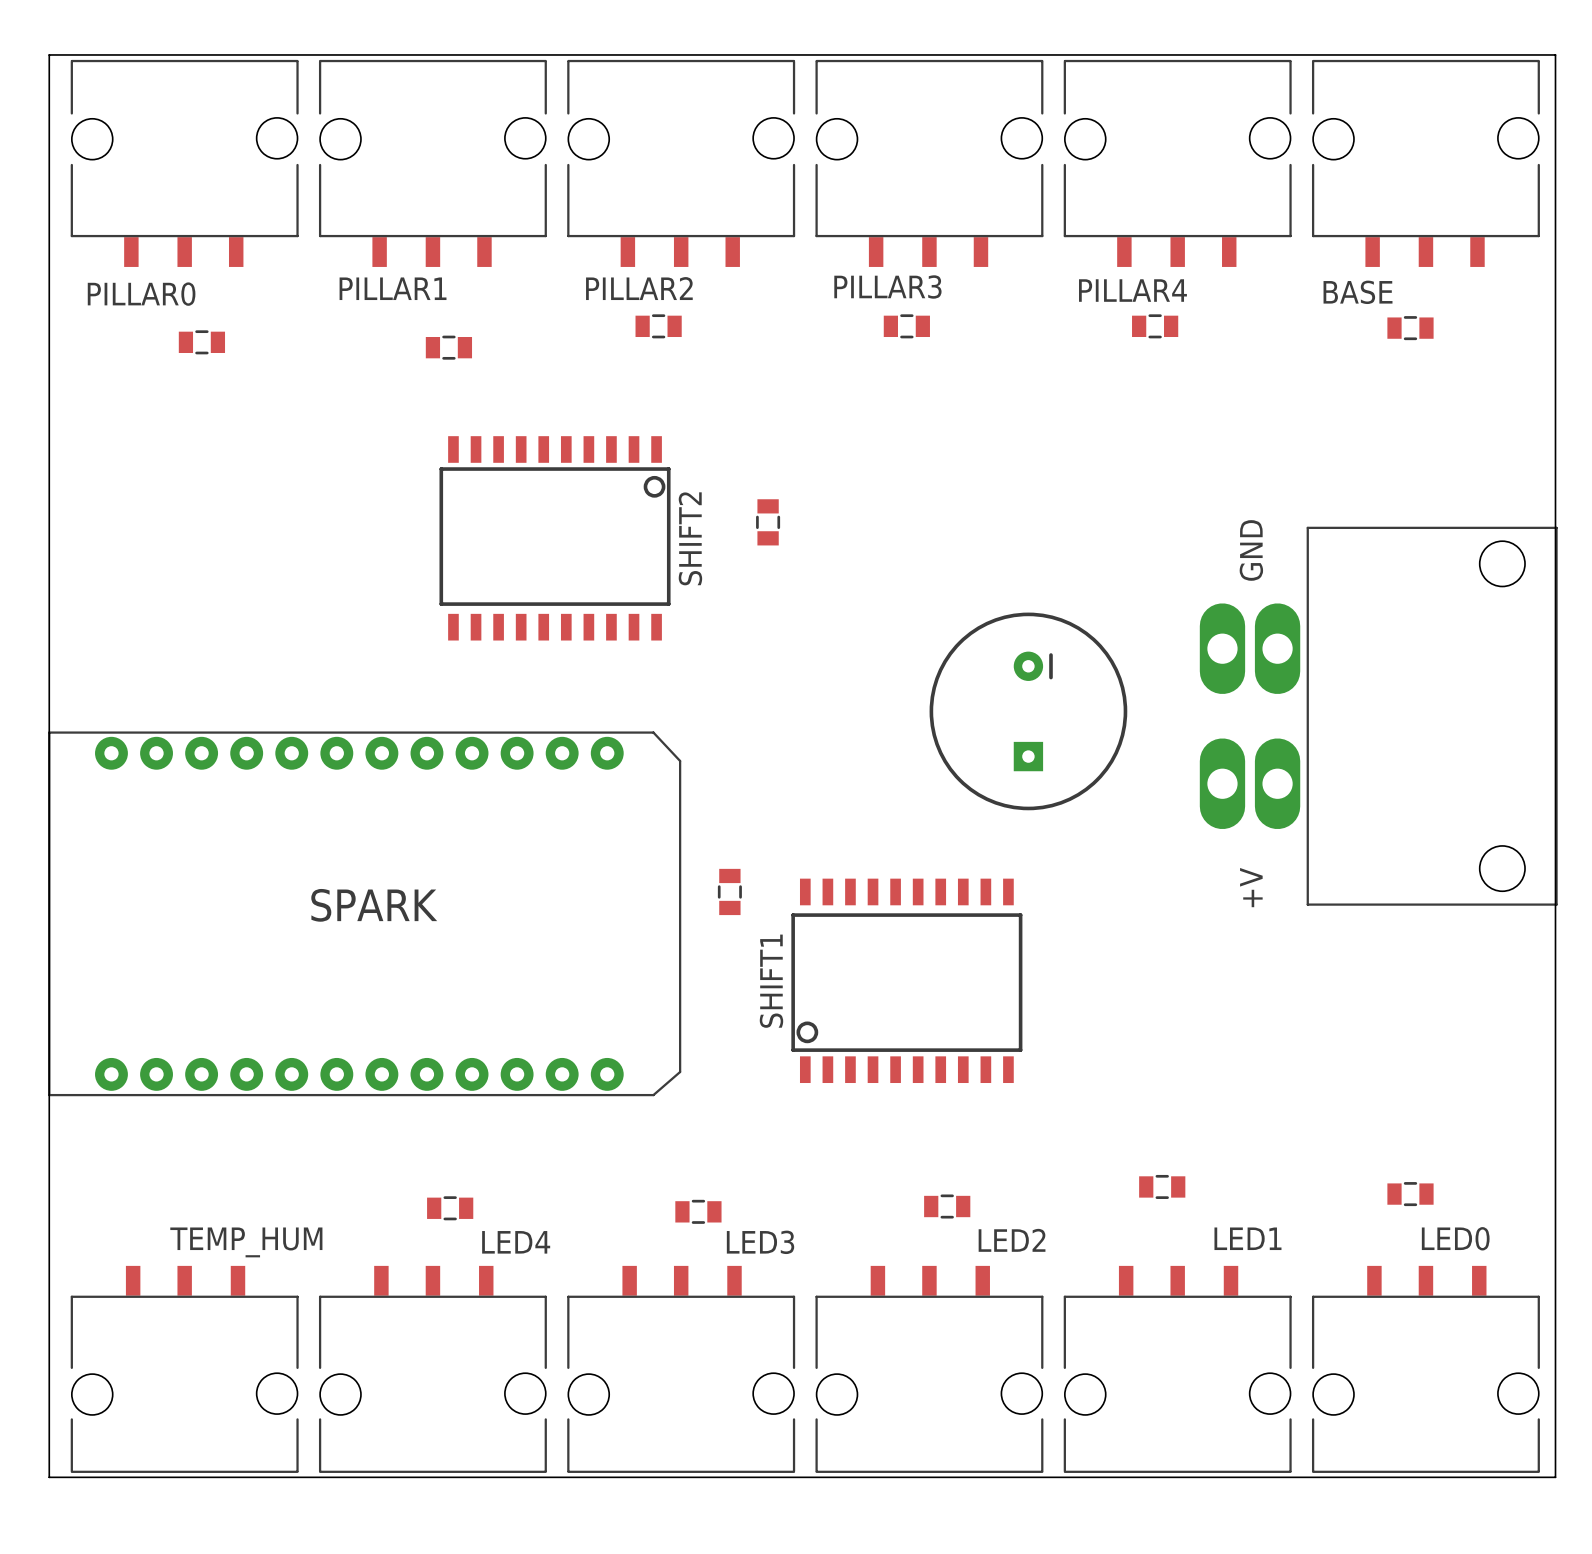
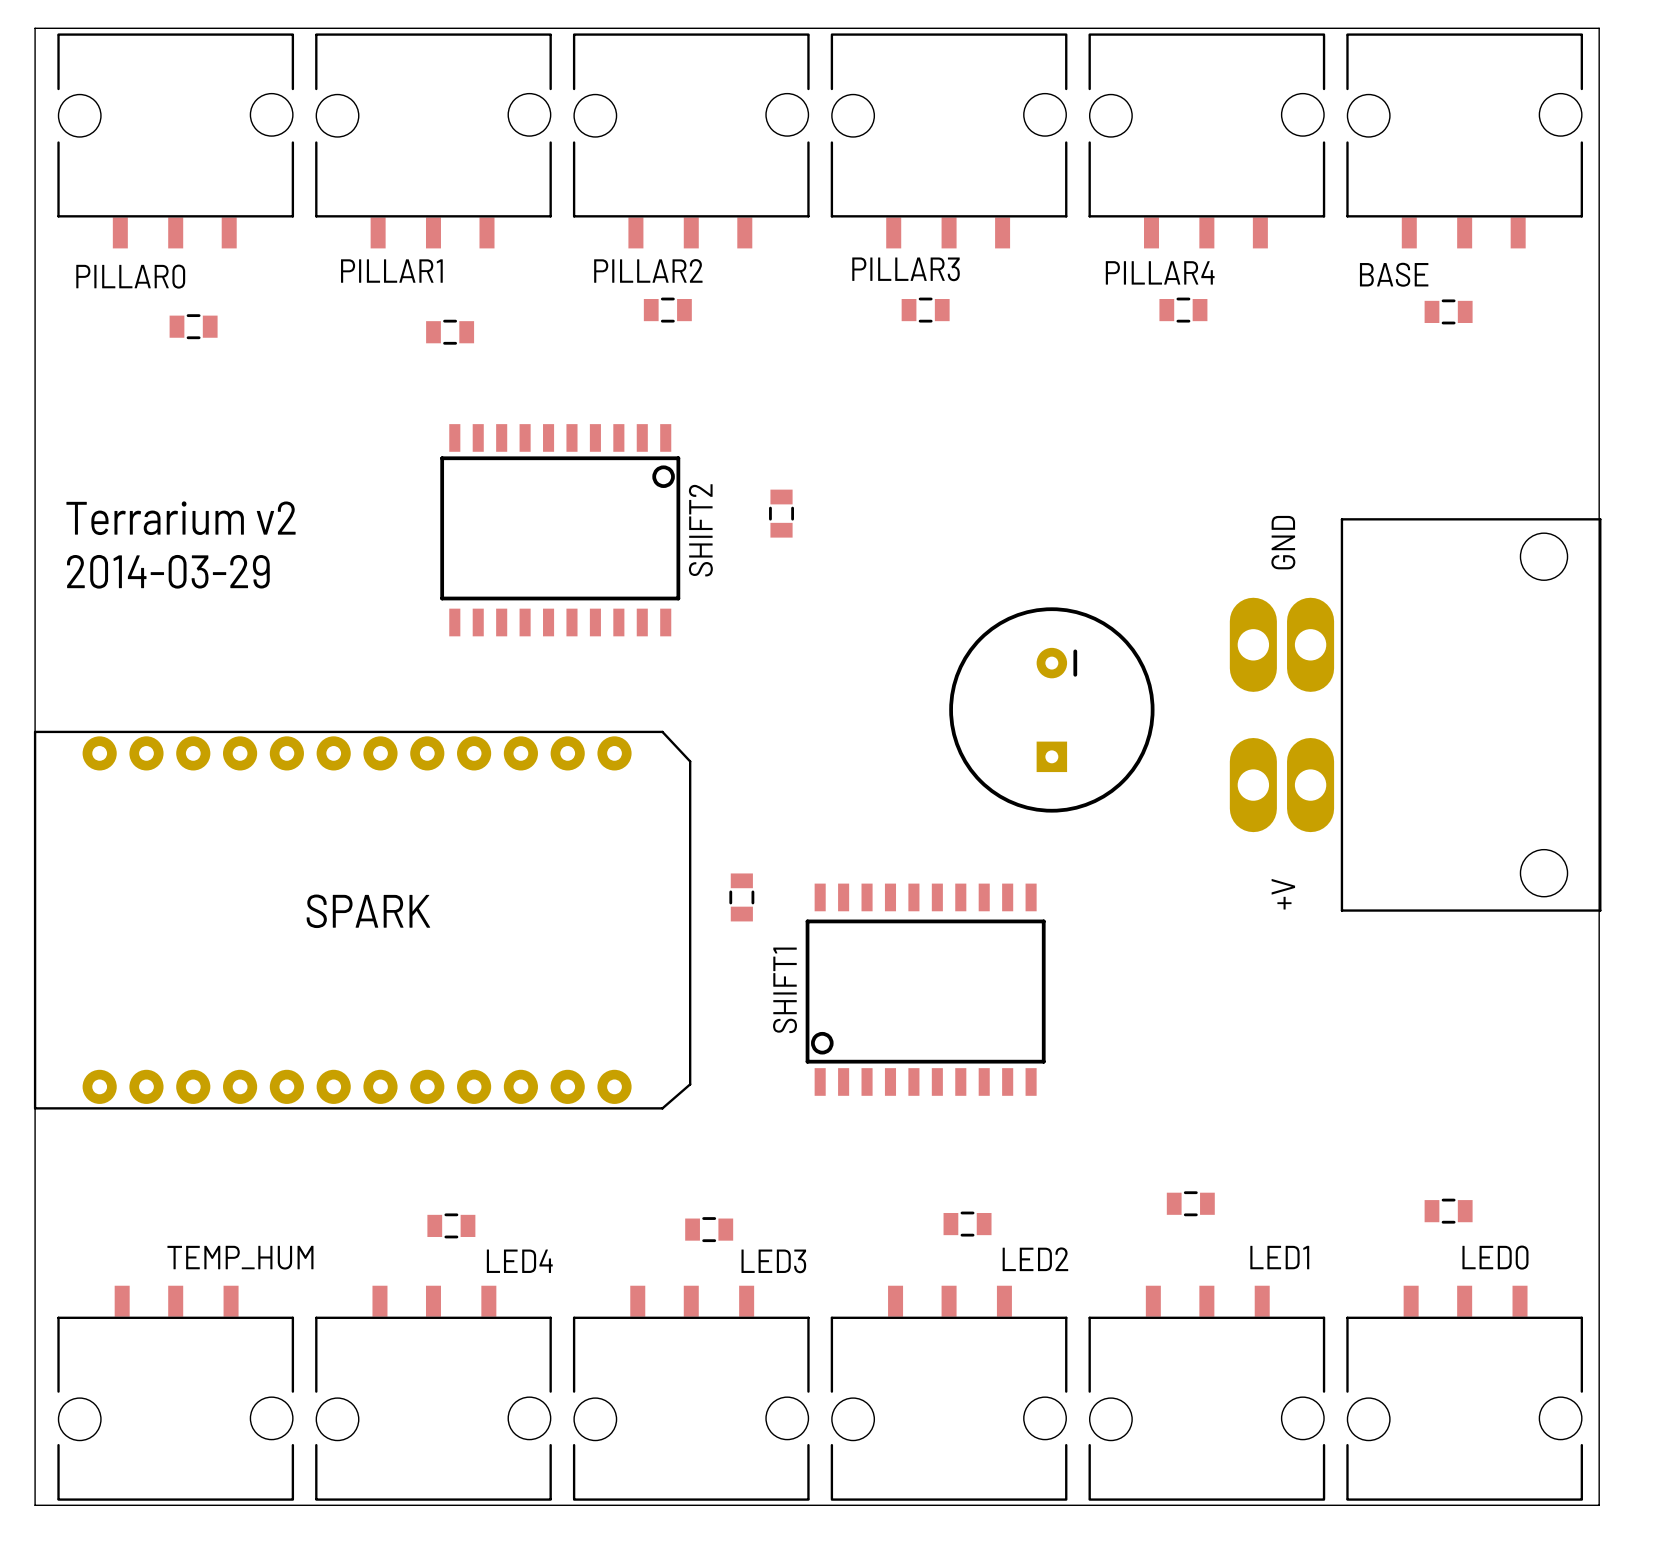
text: none -> Terrarium v2 (181, 518)
text: none -> 2014-03-29 (168, 571)

